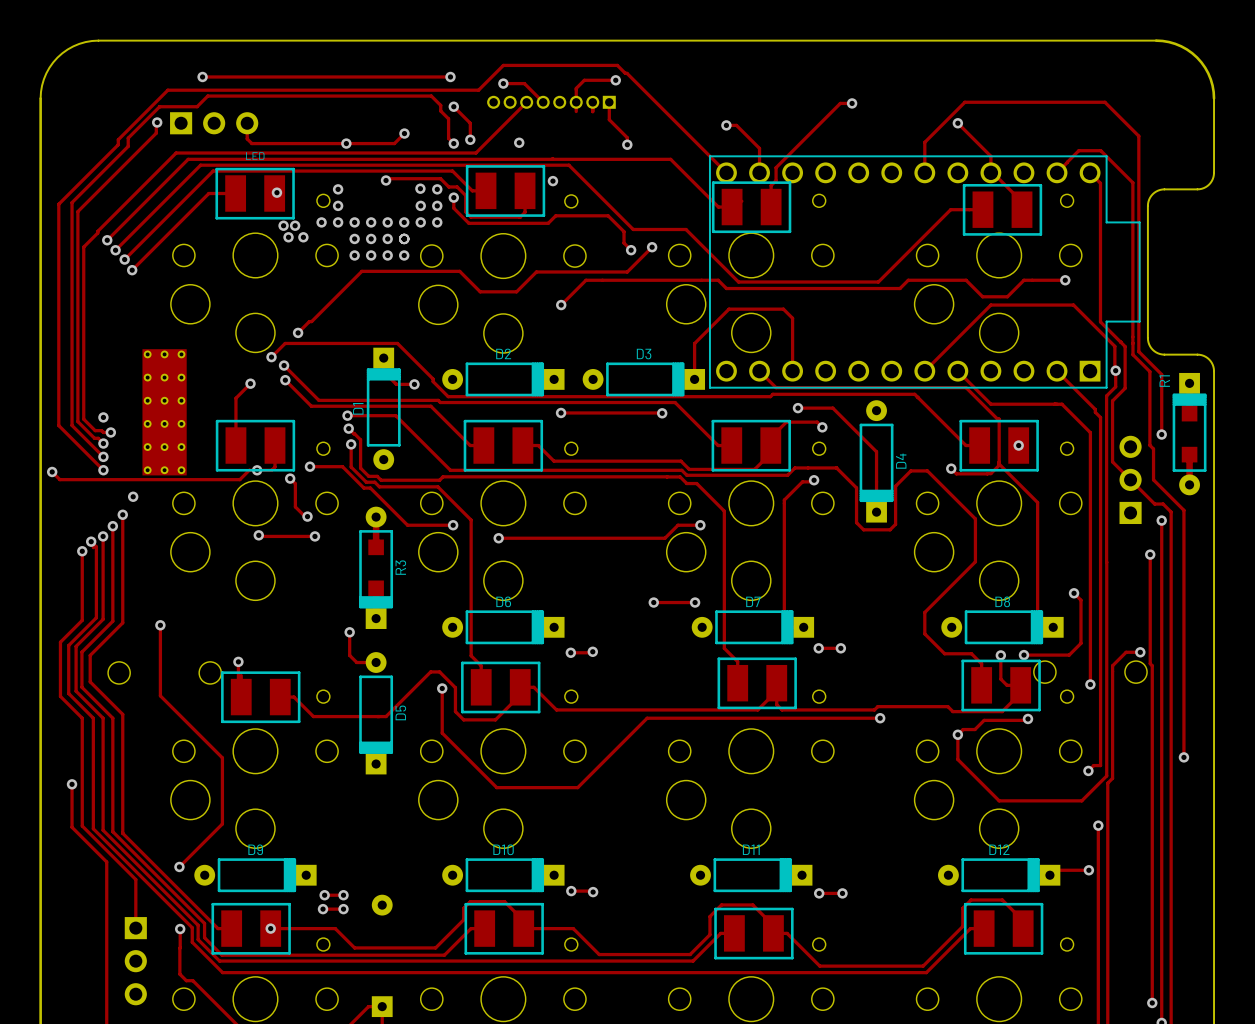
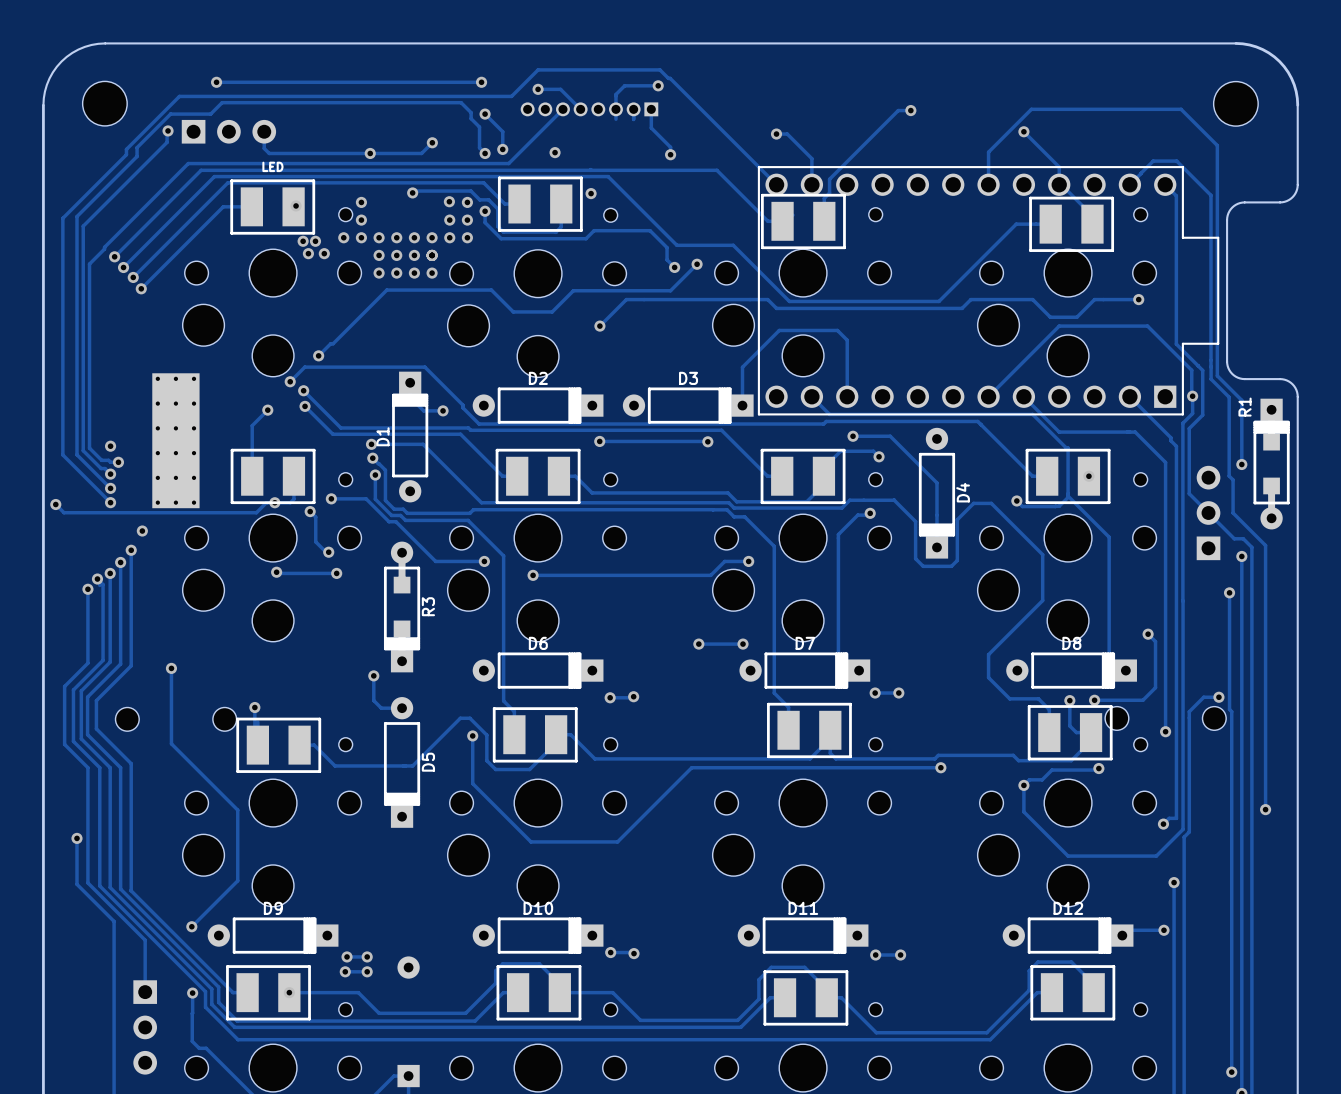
part: none -> (104, 103)
part: none -> (1235, 103)

